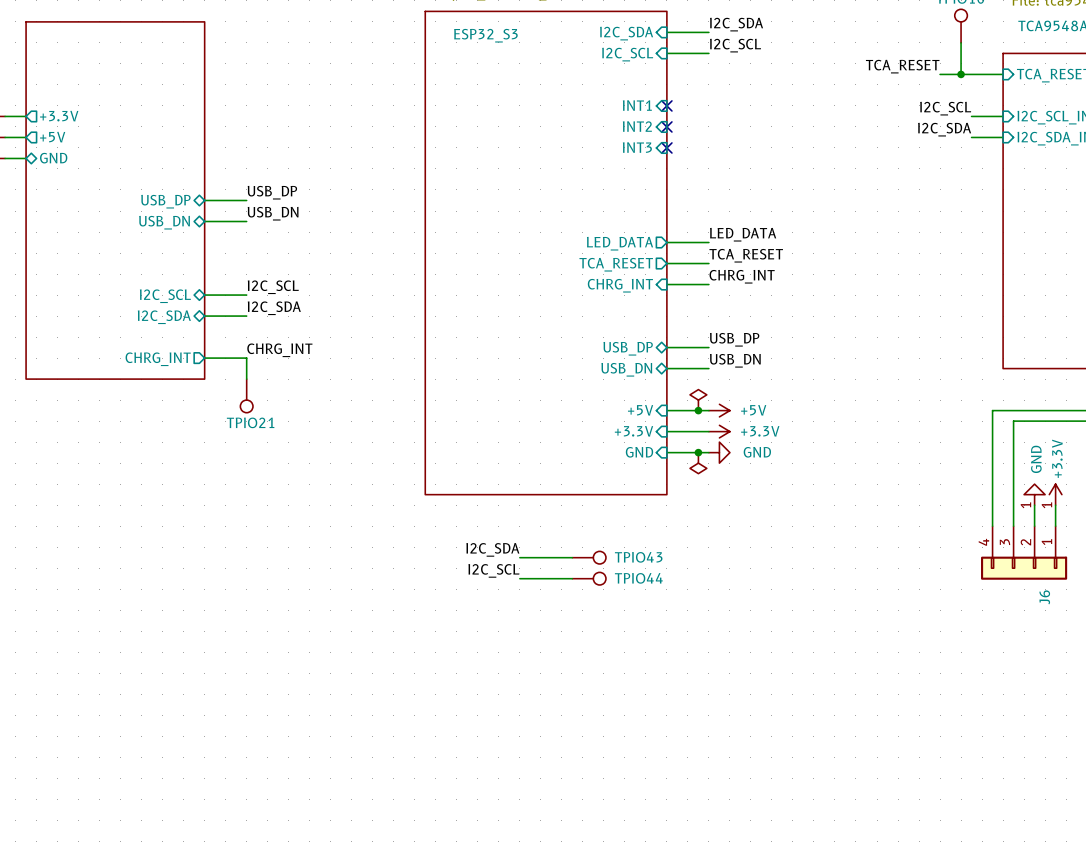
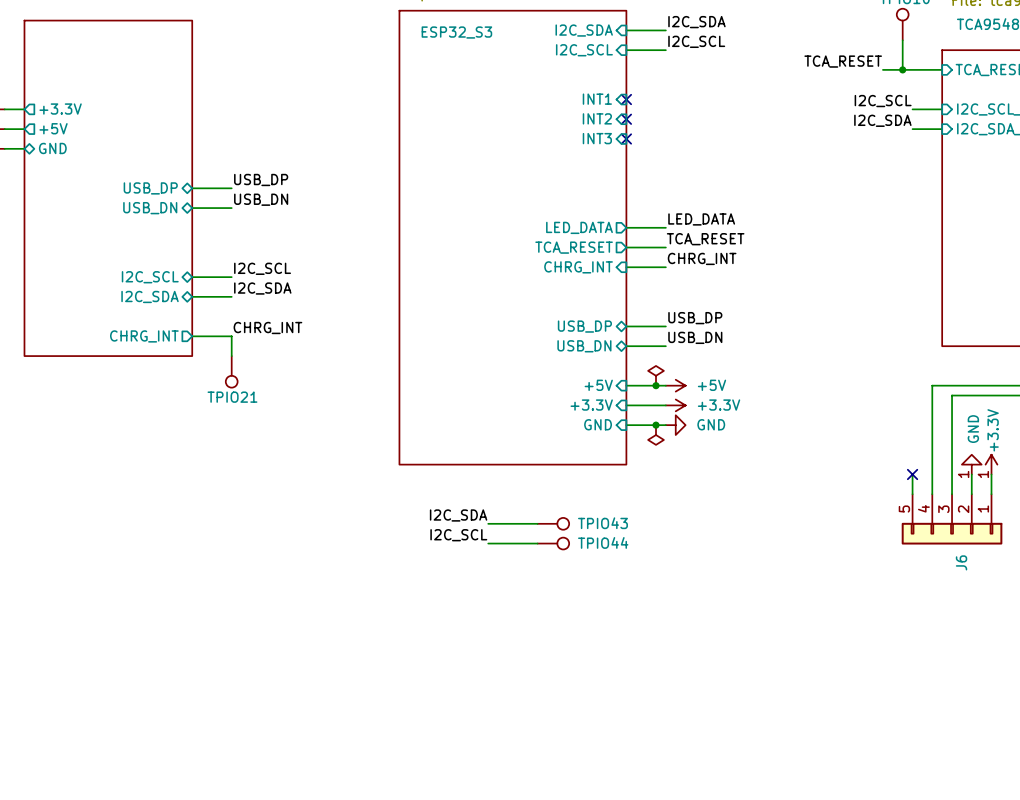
wire: none -> (912, 474) (912, 494)
no-connect mark: none -> (912, 474)
J6 symbol: [981, 526, 1068, 580] -> [901, 494, 1003, 545]

